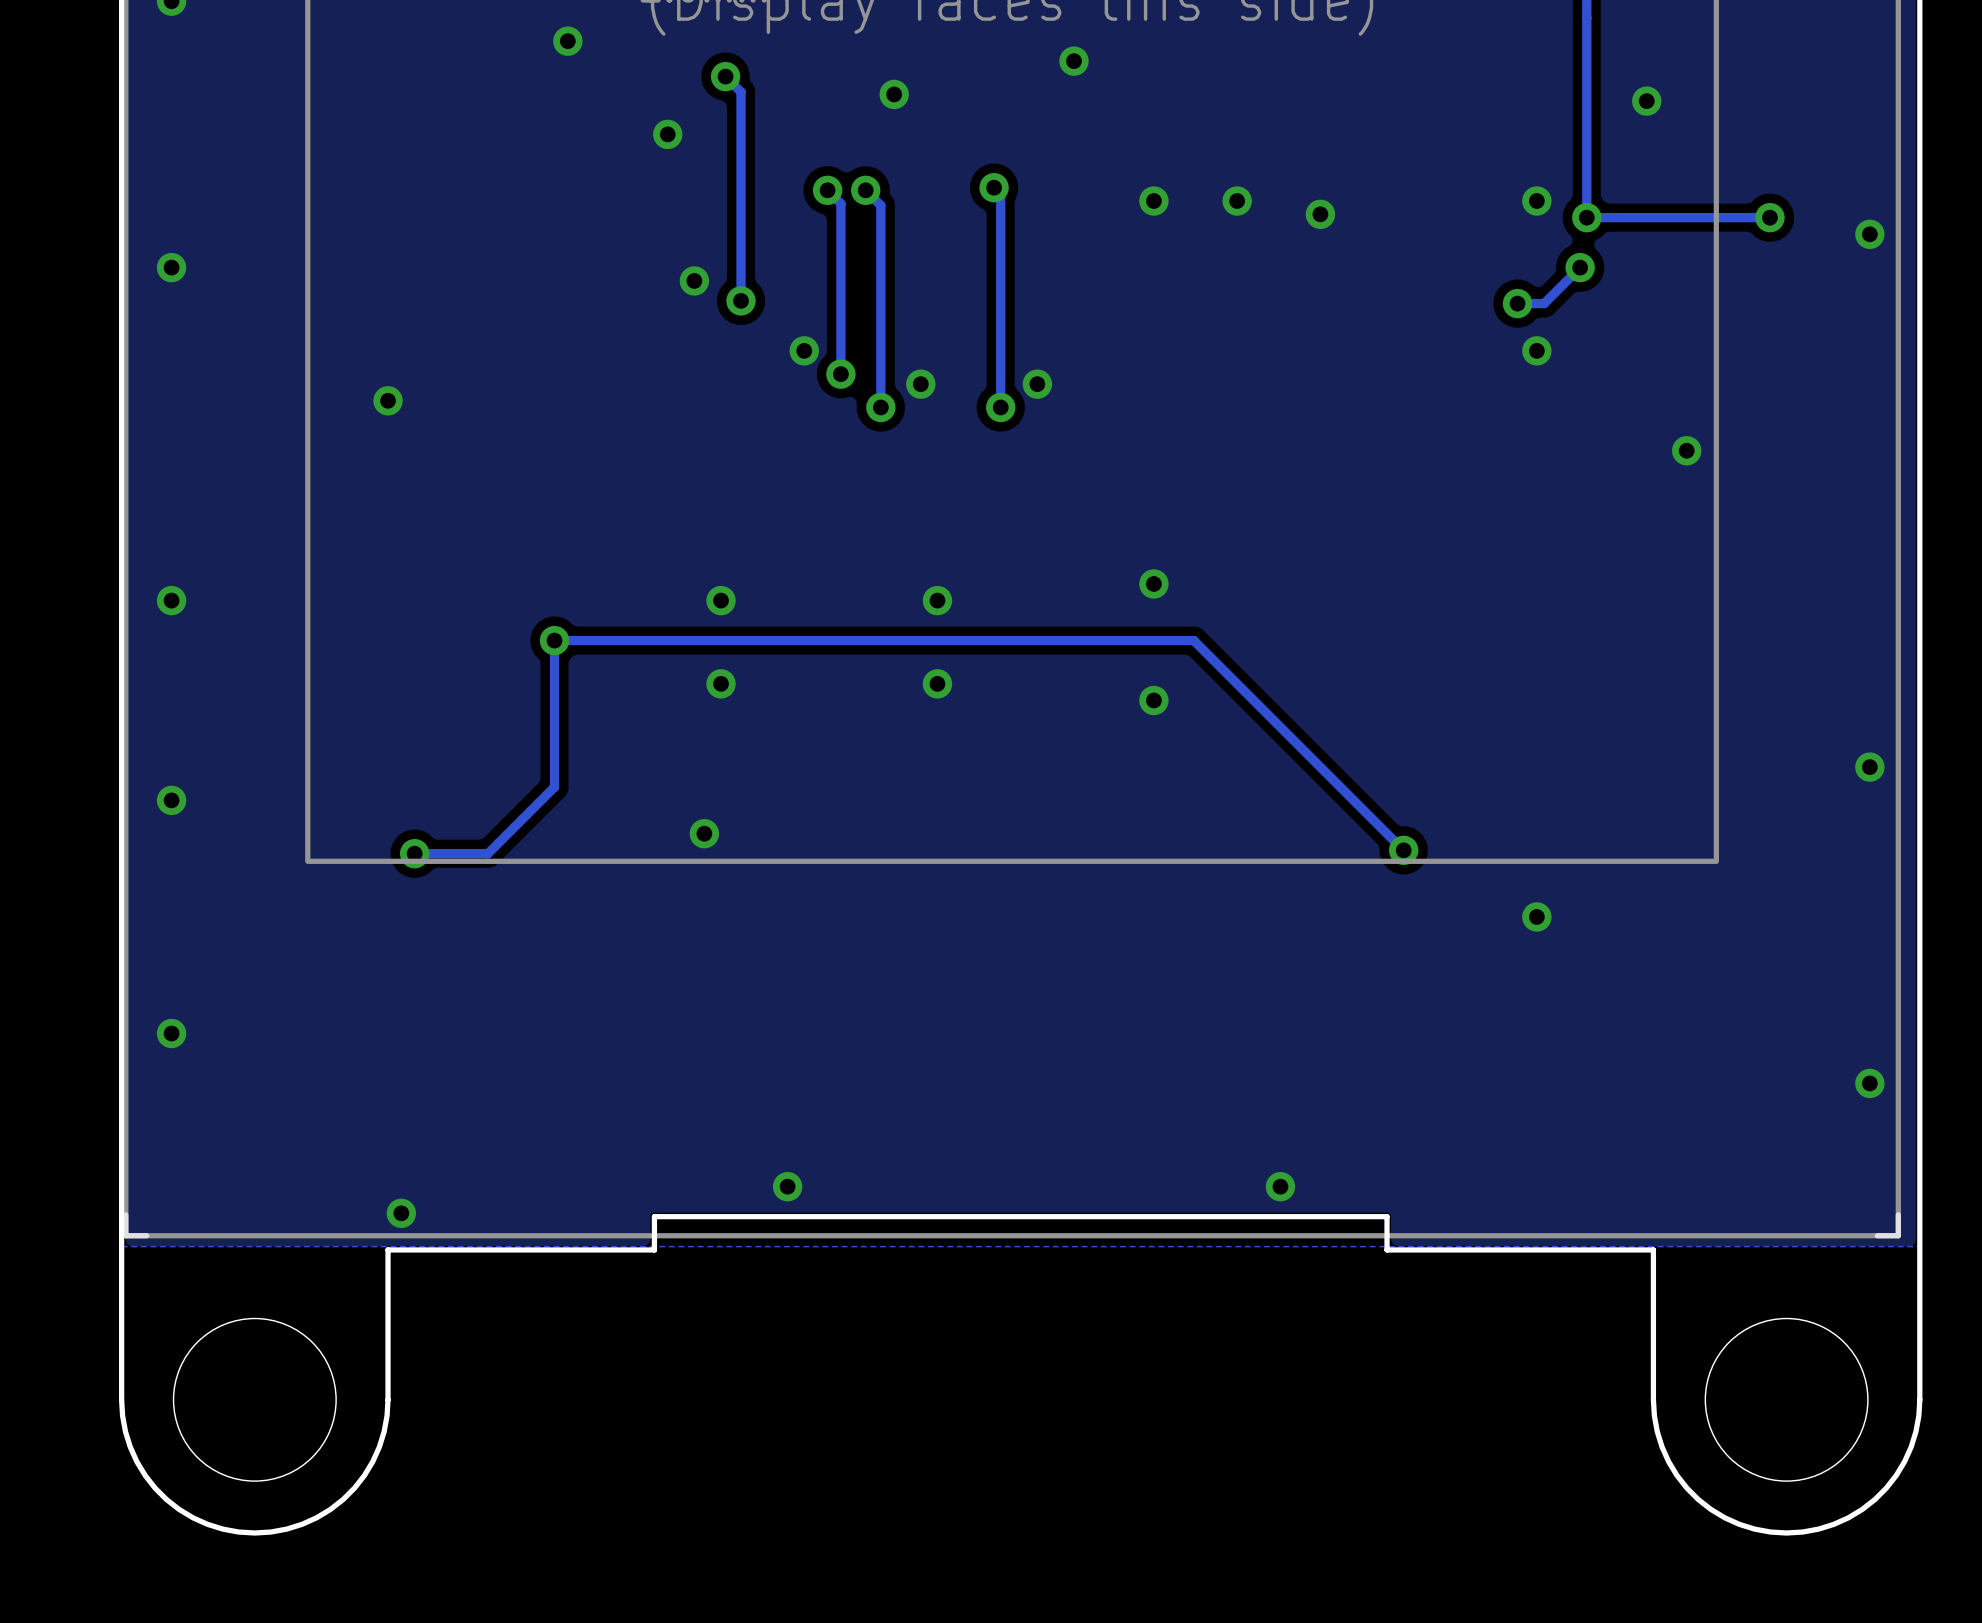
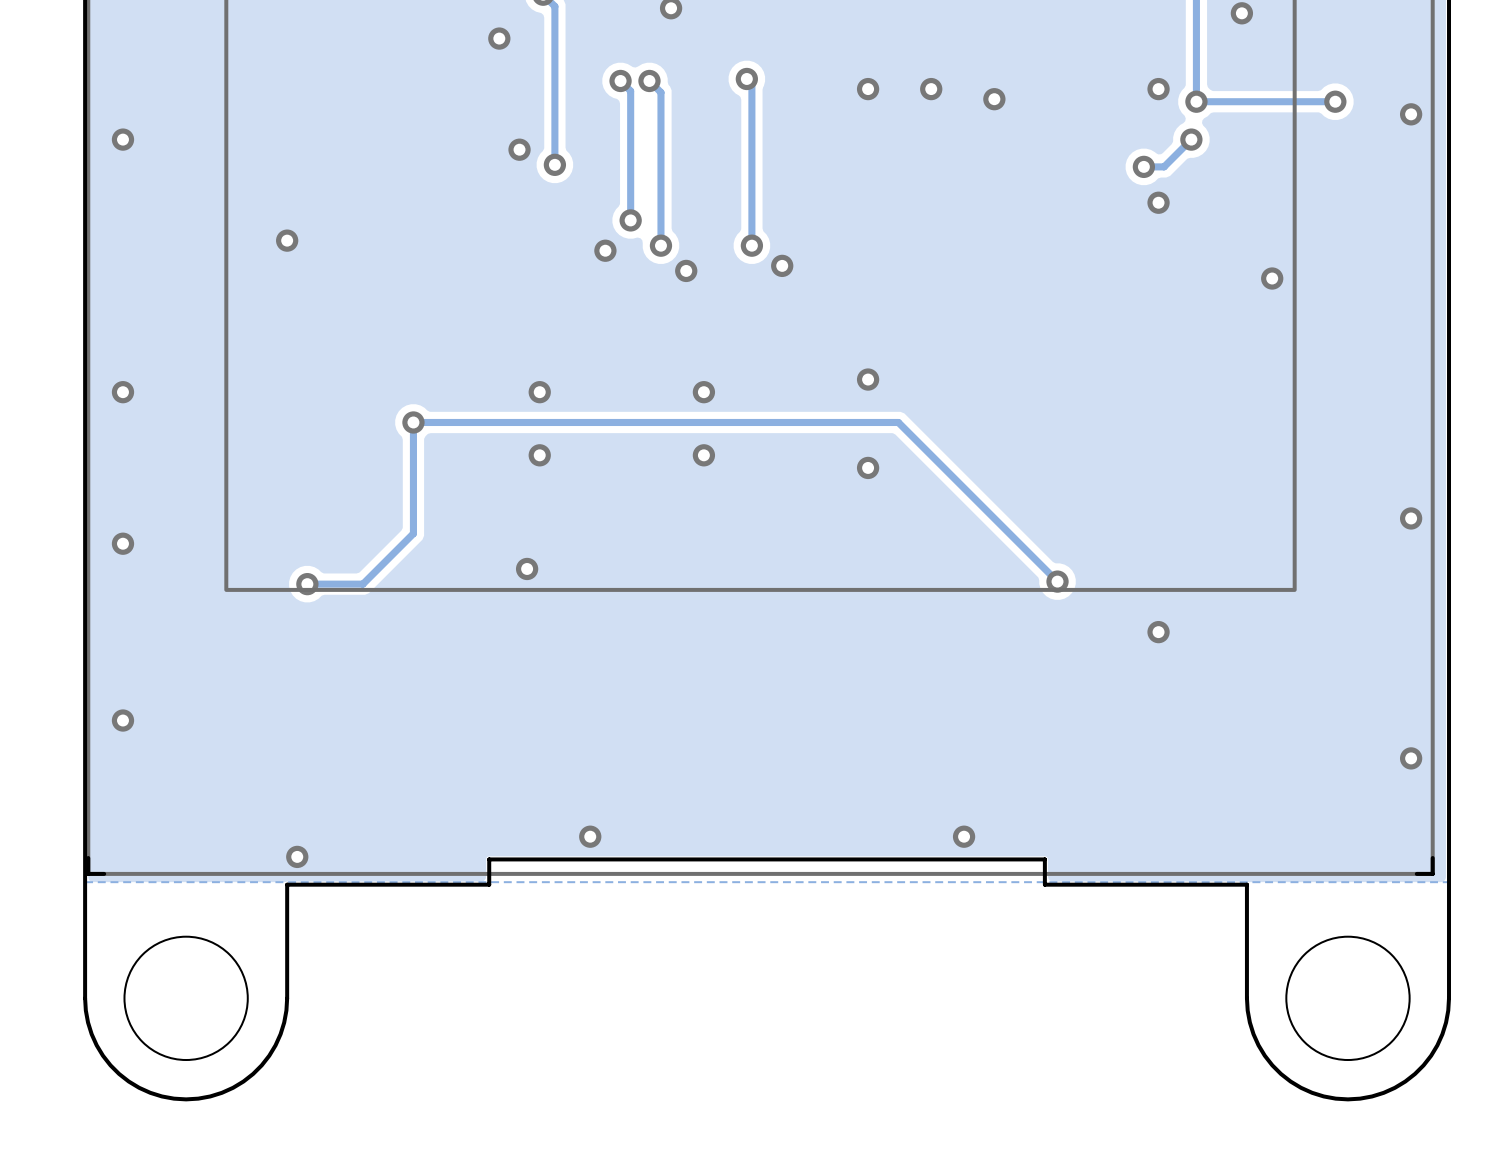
via: (804, 350) -> none
via position: (920, 384) -> (686, 270)
via position: (1037, 384) -> (782, 265)
via: none -> (605, 250)

